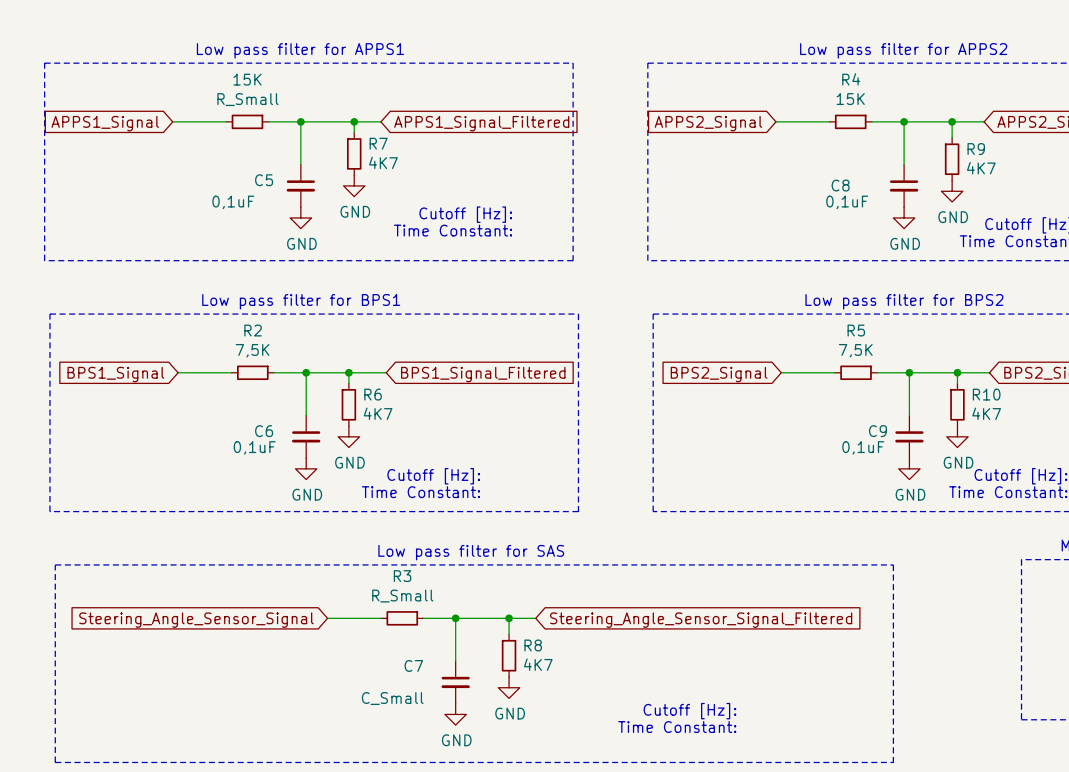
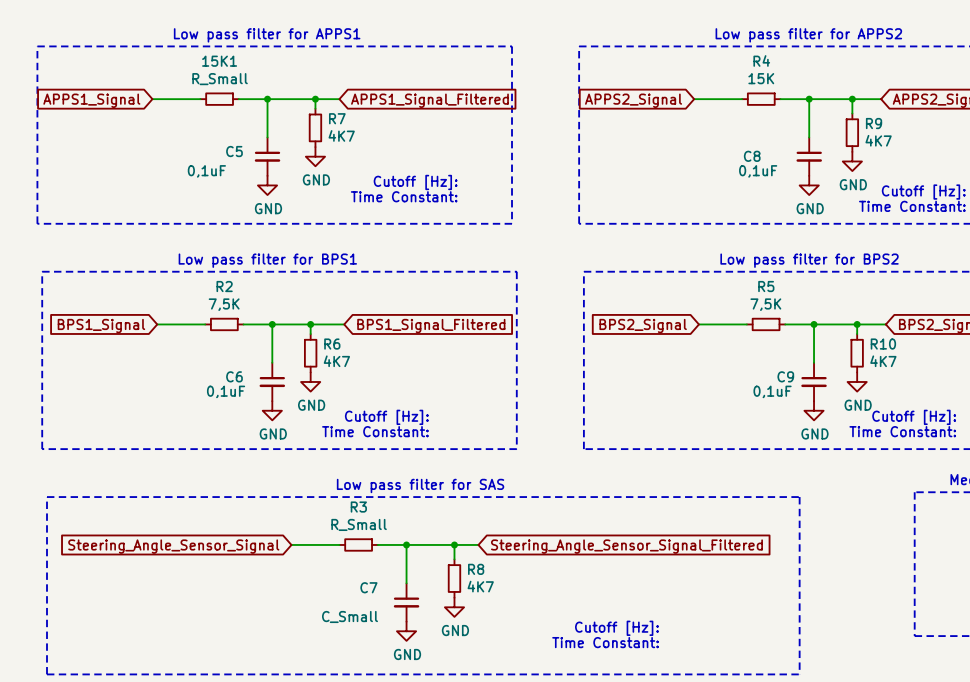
15K name: 15K (247, 79) -> 15K1 (219, 61)

